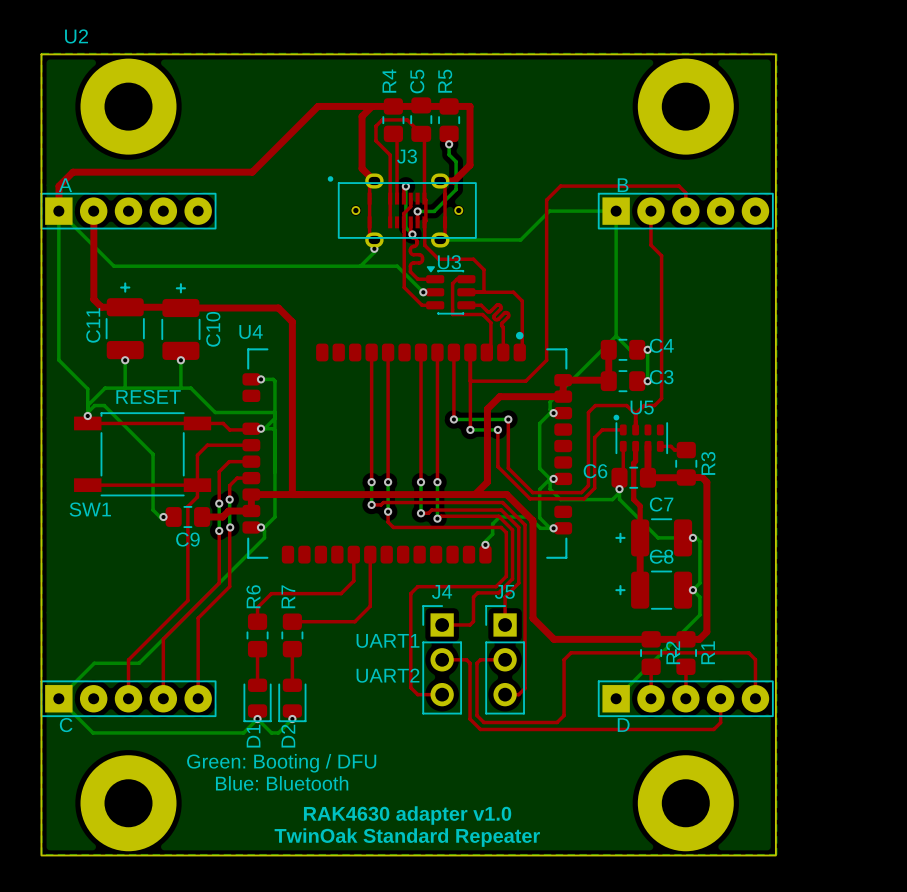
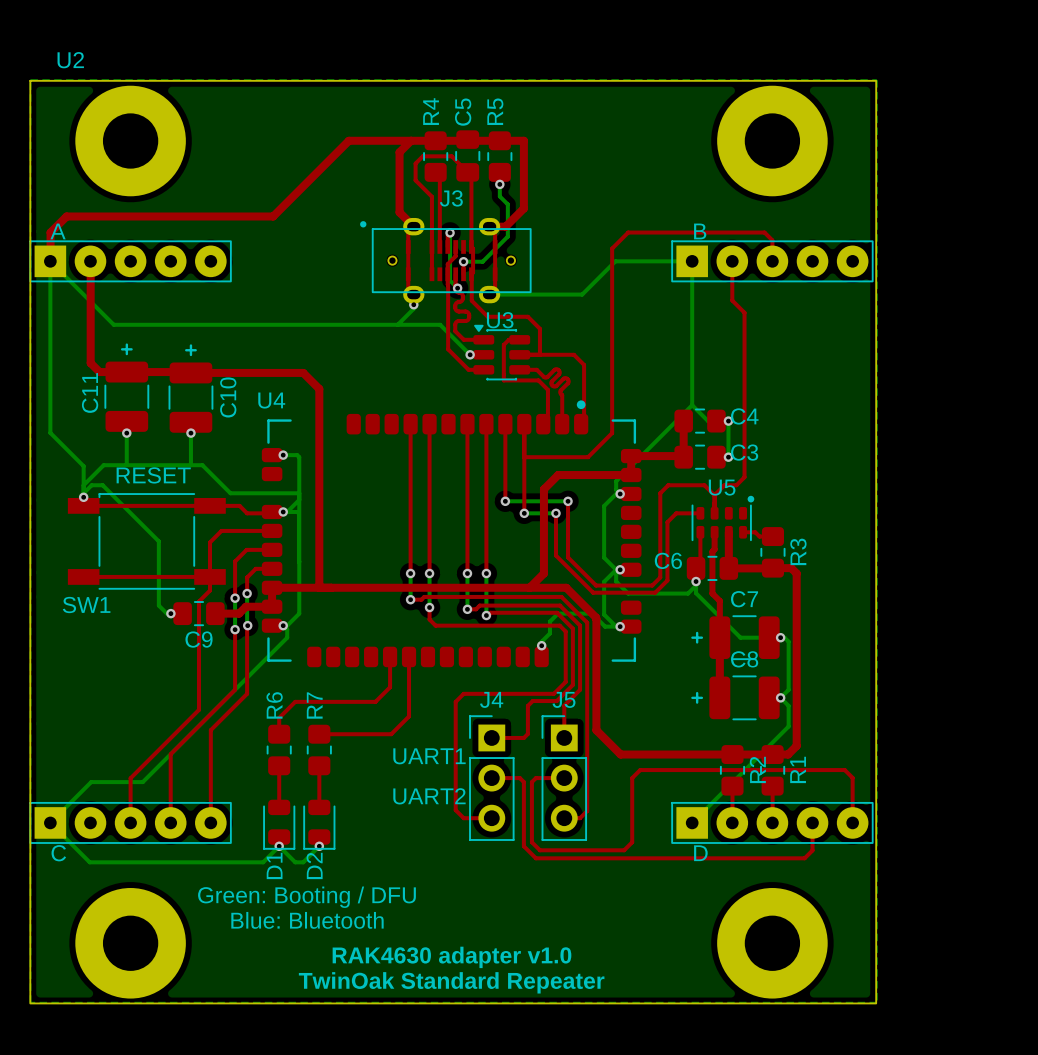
U5 footprint: [613, 414, 668, 455] -> [691, 495, 755, 542]

